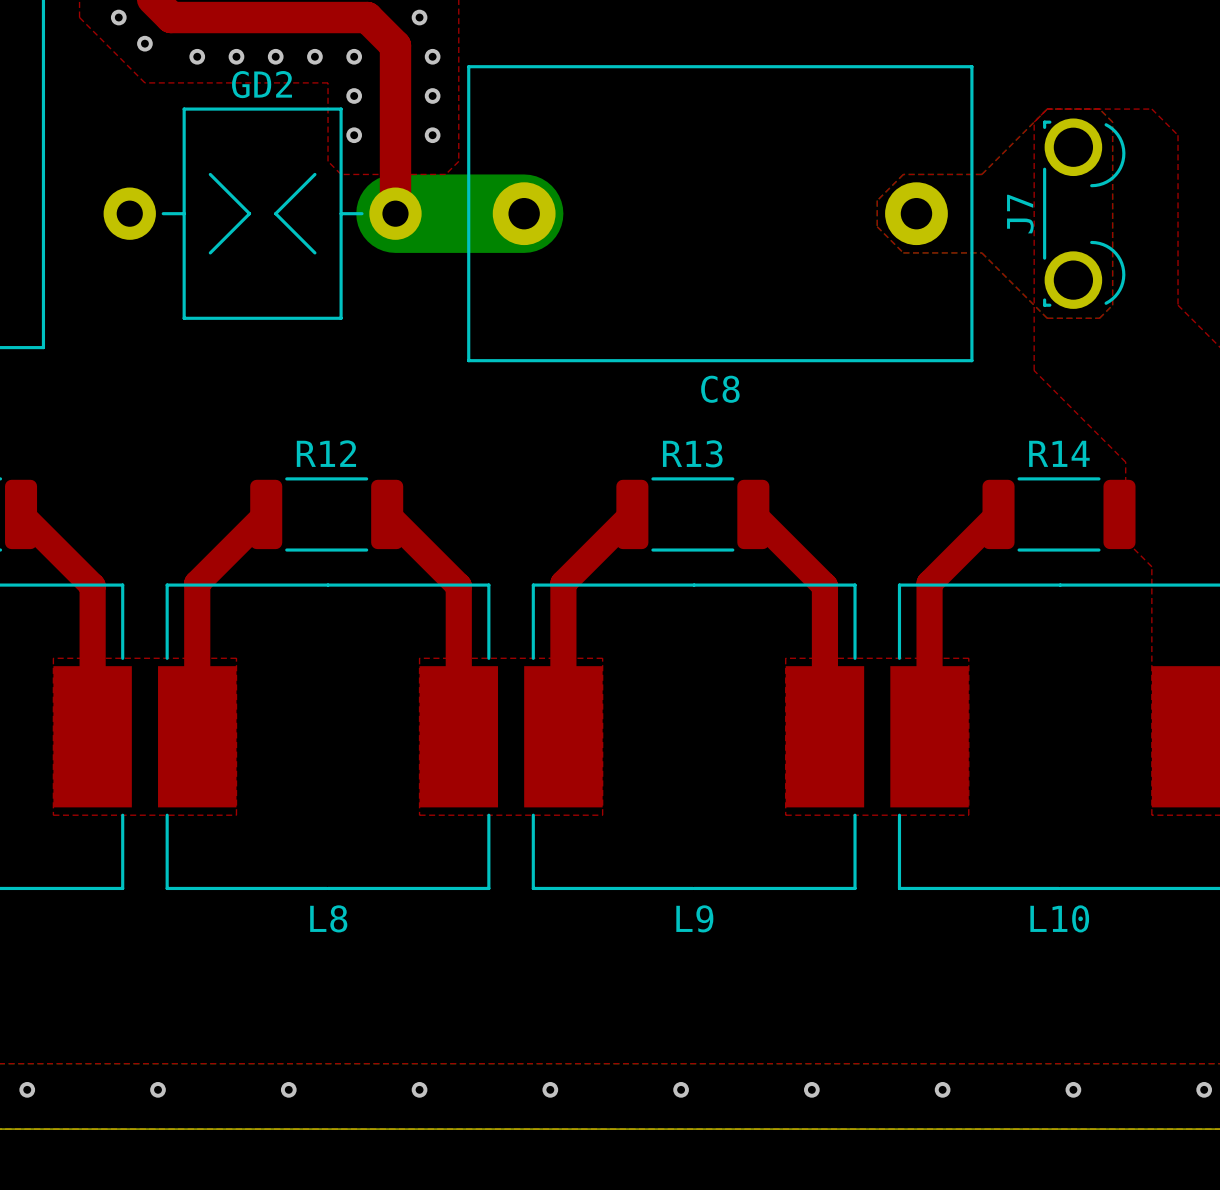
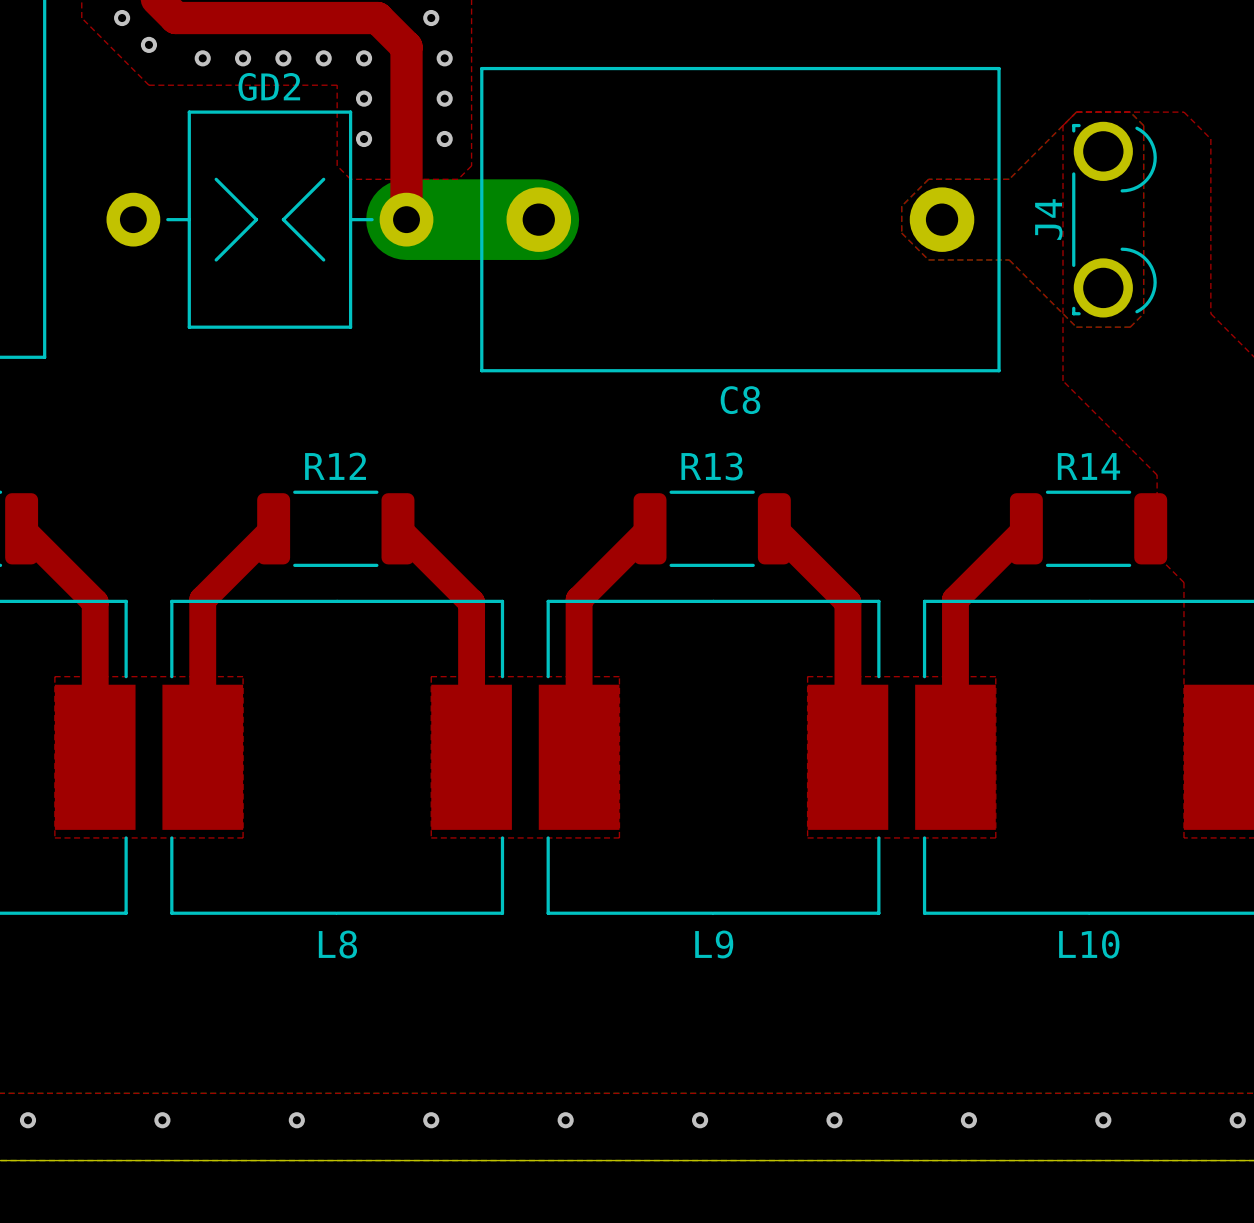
J7 name: J7 (1020, 214) -> J4 (1048, 219)

